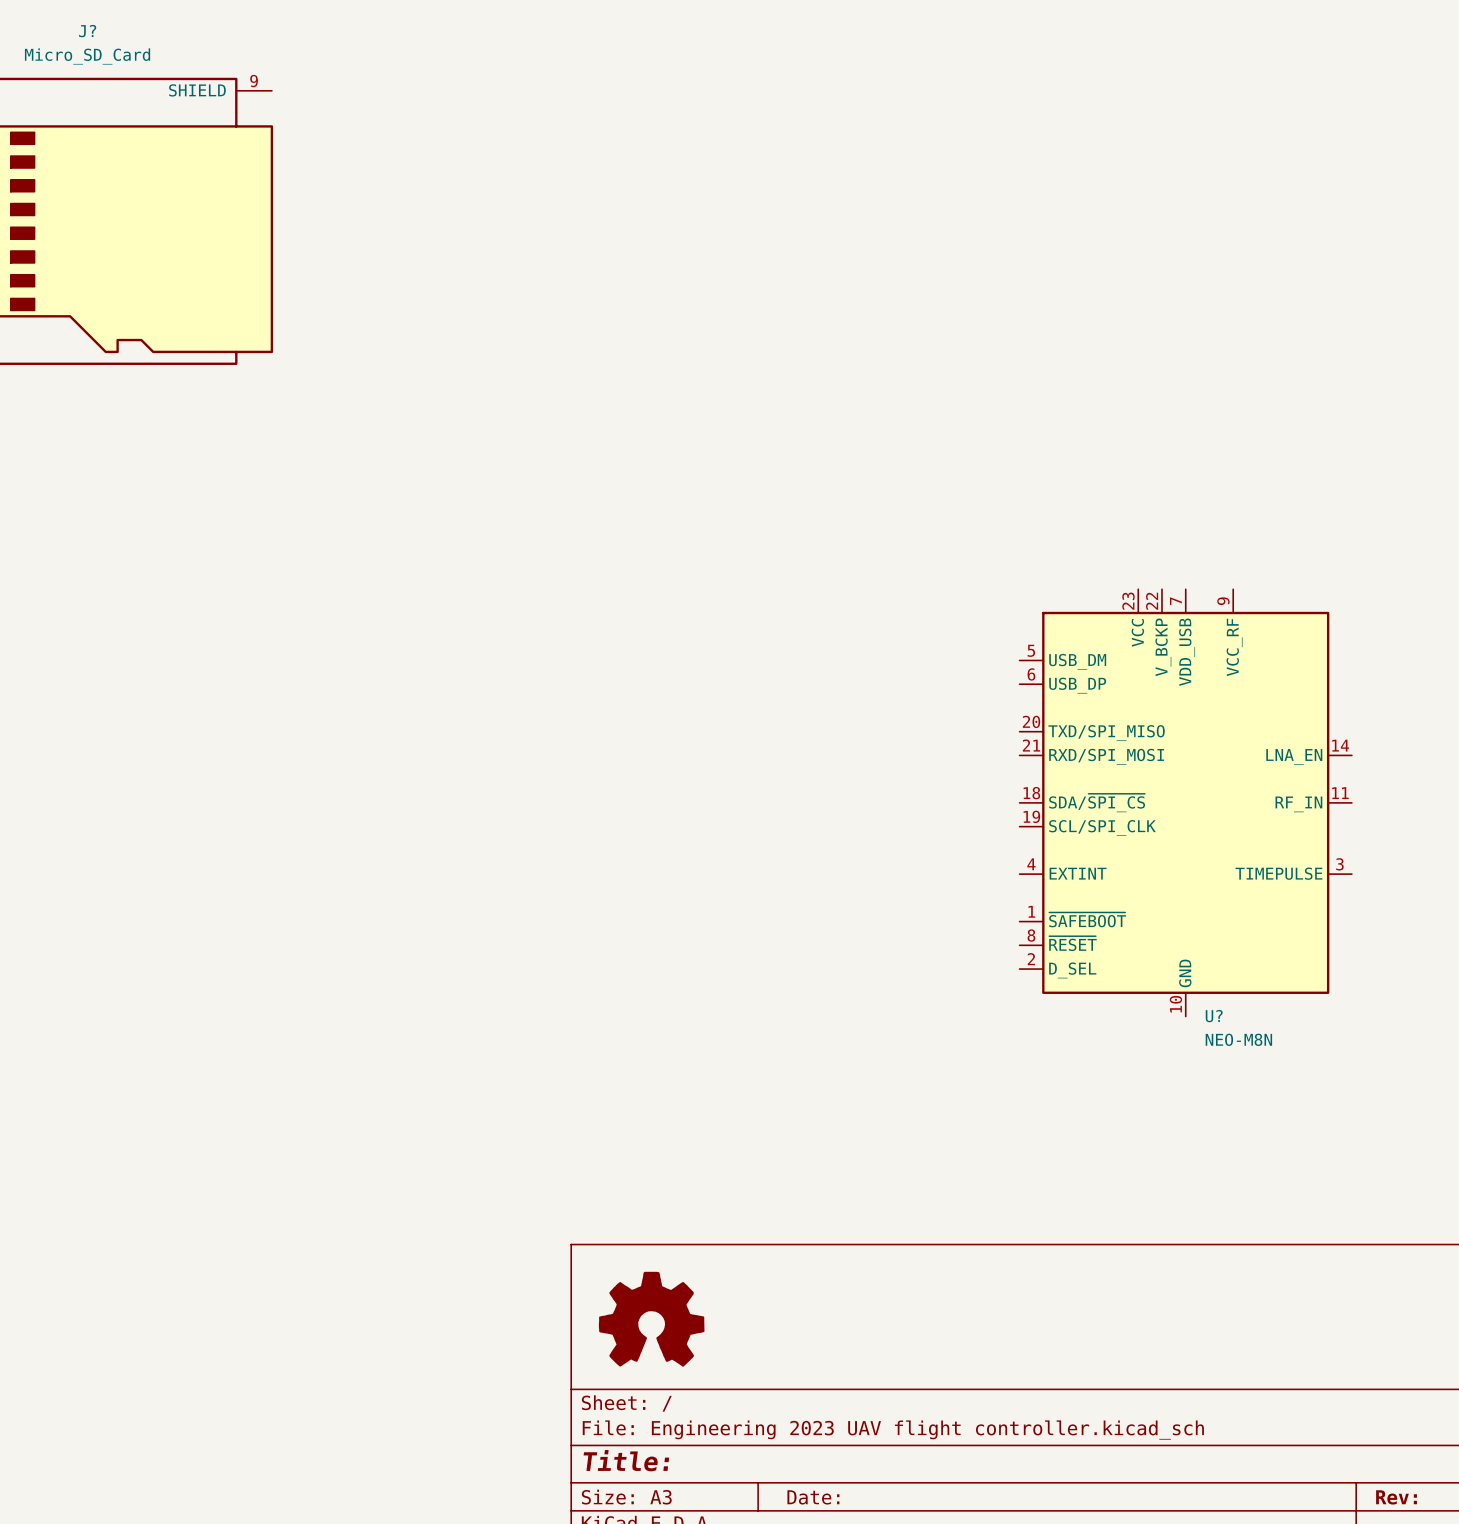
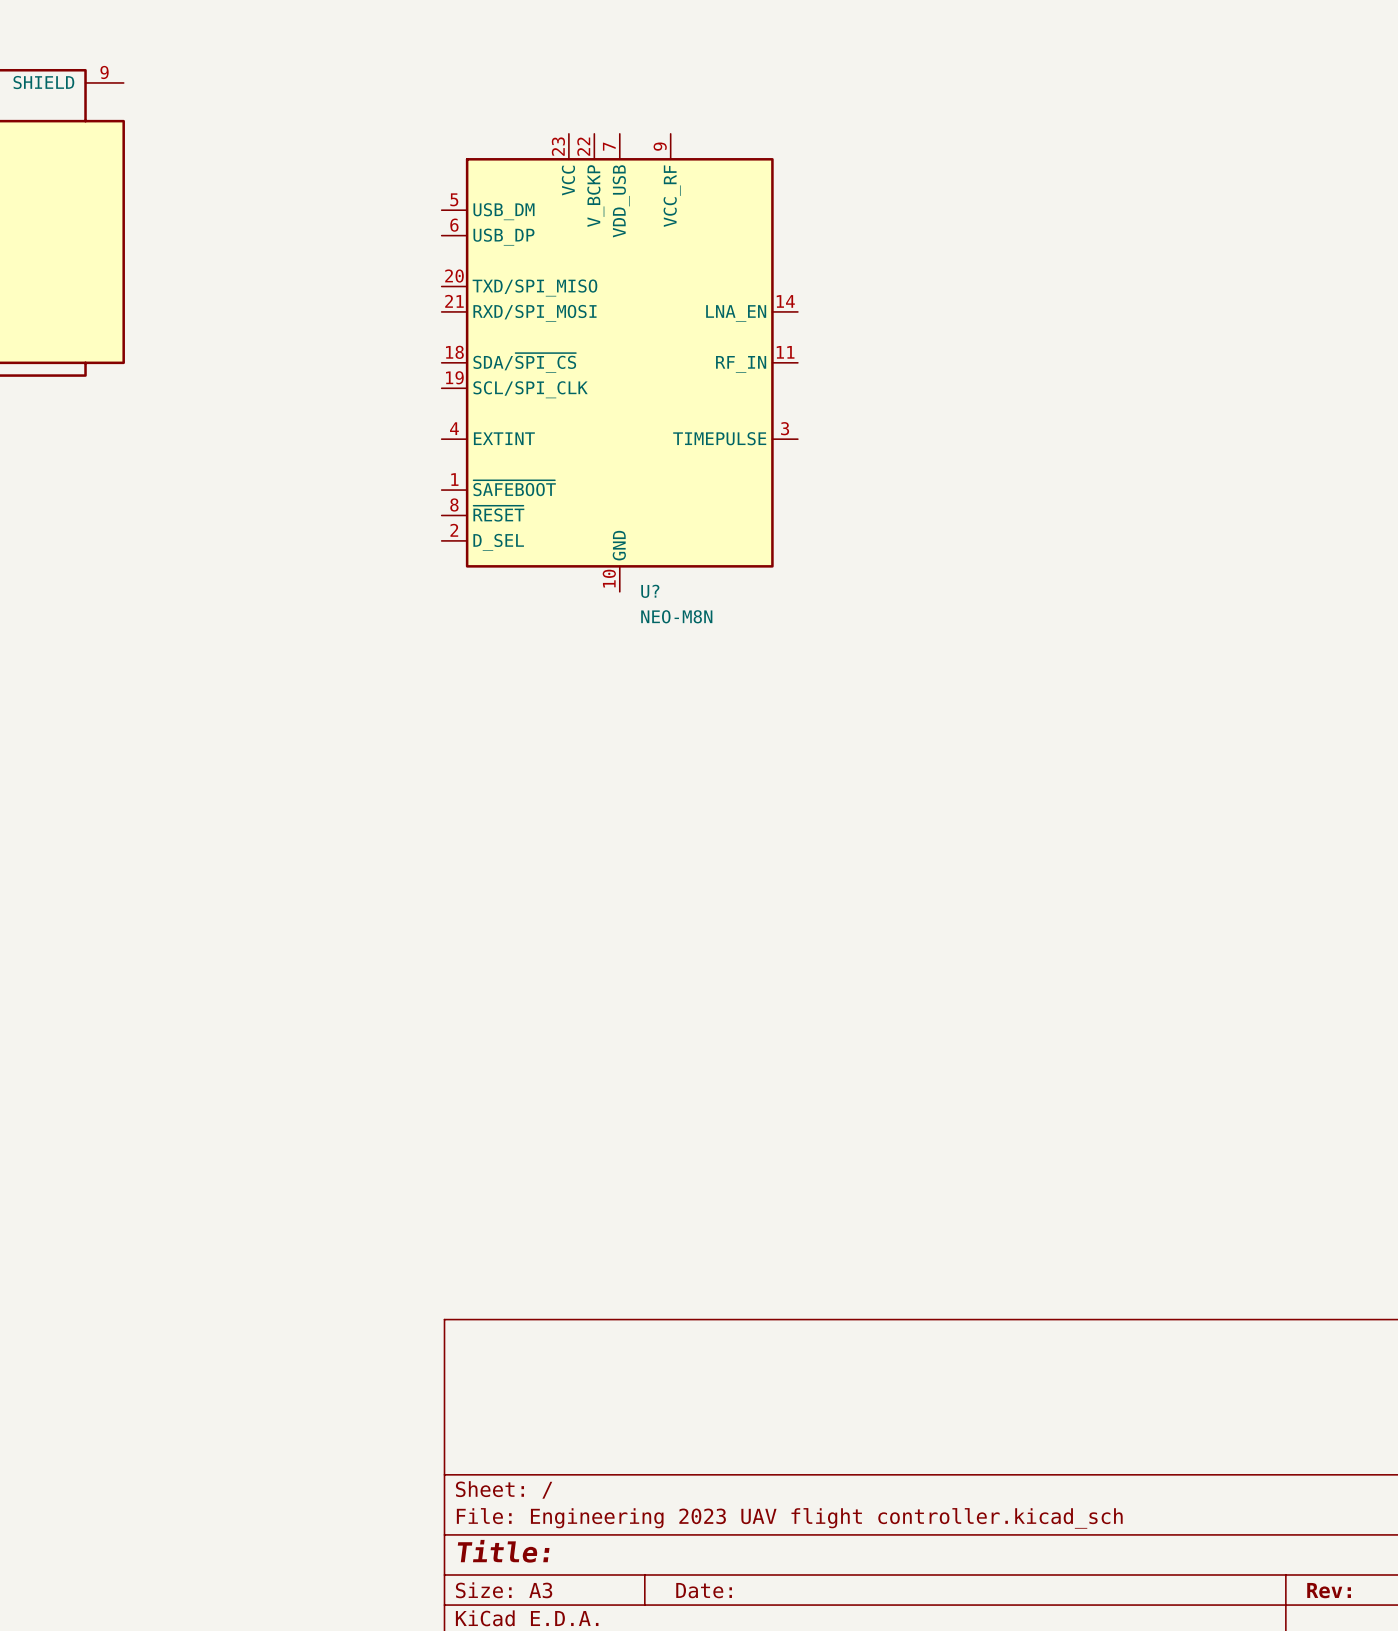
U?: none -> NEO-M8N (619, 362)
U?: NEO-M8N (1185, 802) -> none
power symbol: (651, 1319) -> none

